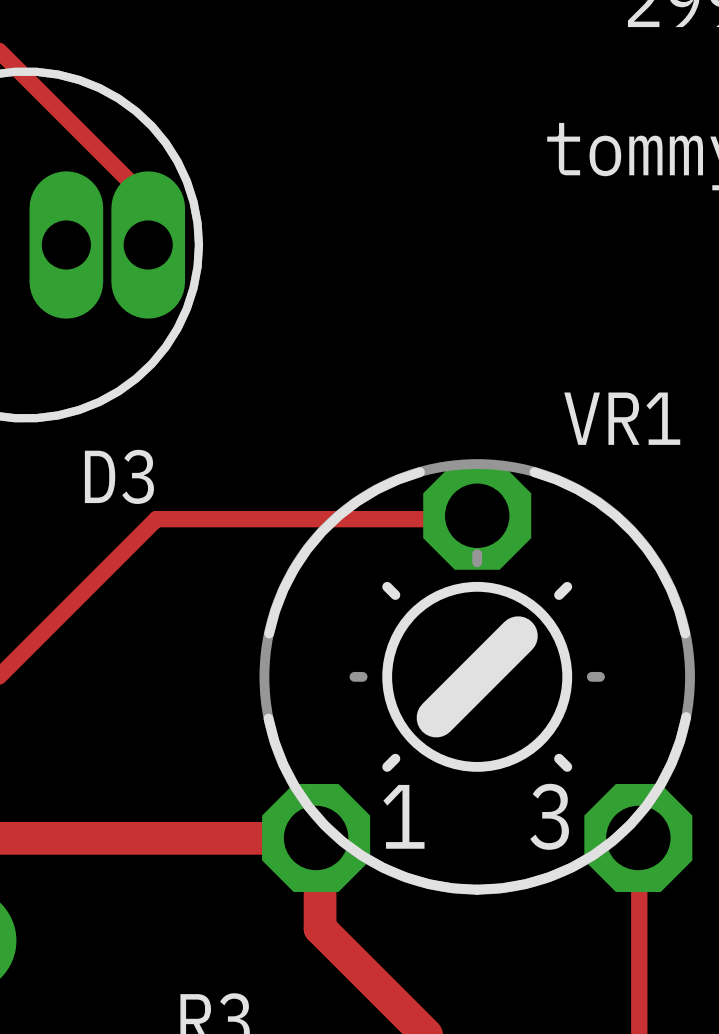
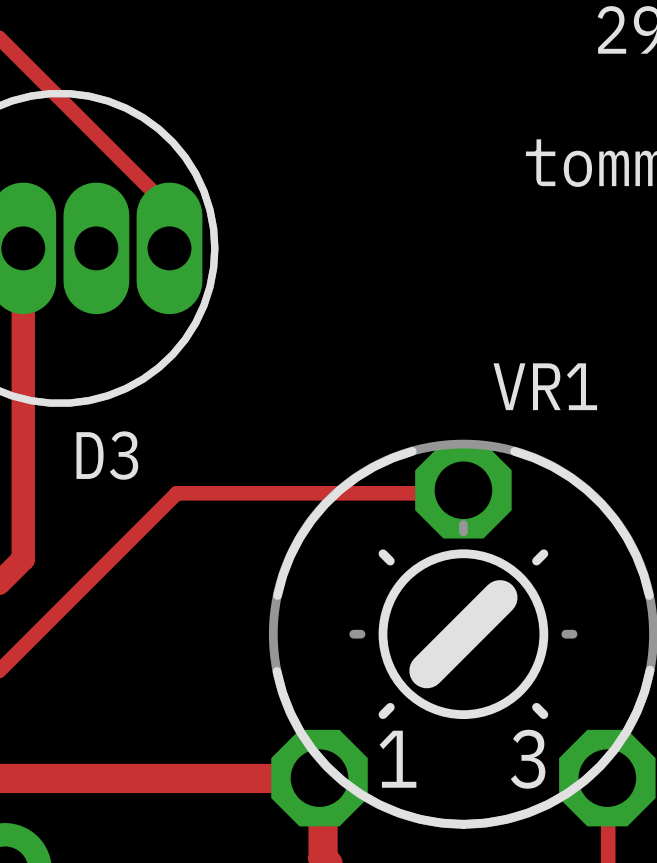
VR1 name position: VR1 (622, 418) -> VR1 (545, 386)
D3 name position: D3 (119, 476) -> D3 (107, 455)

